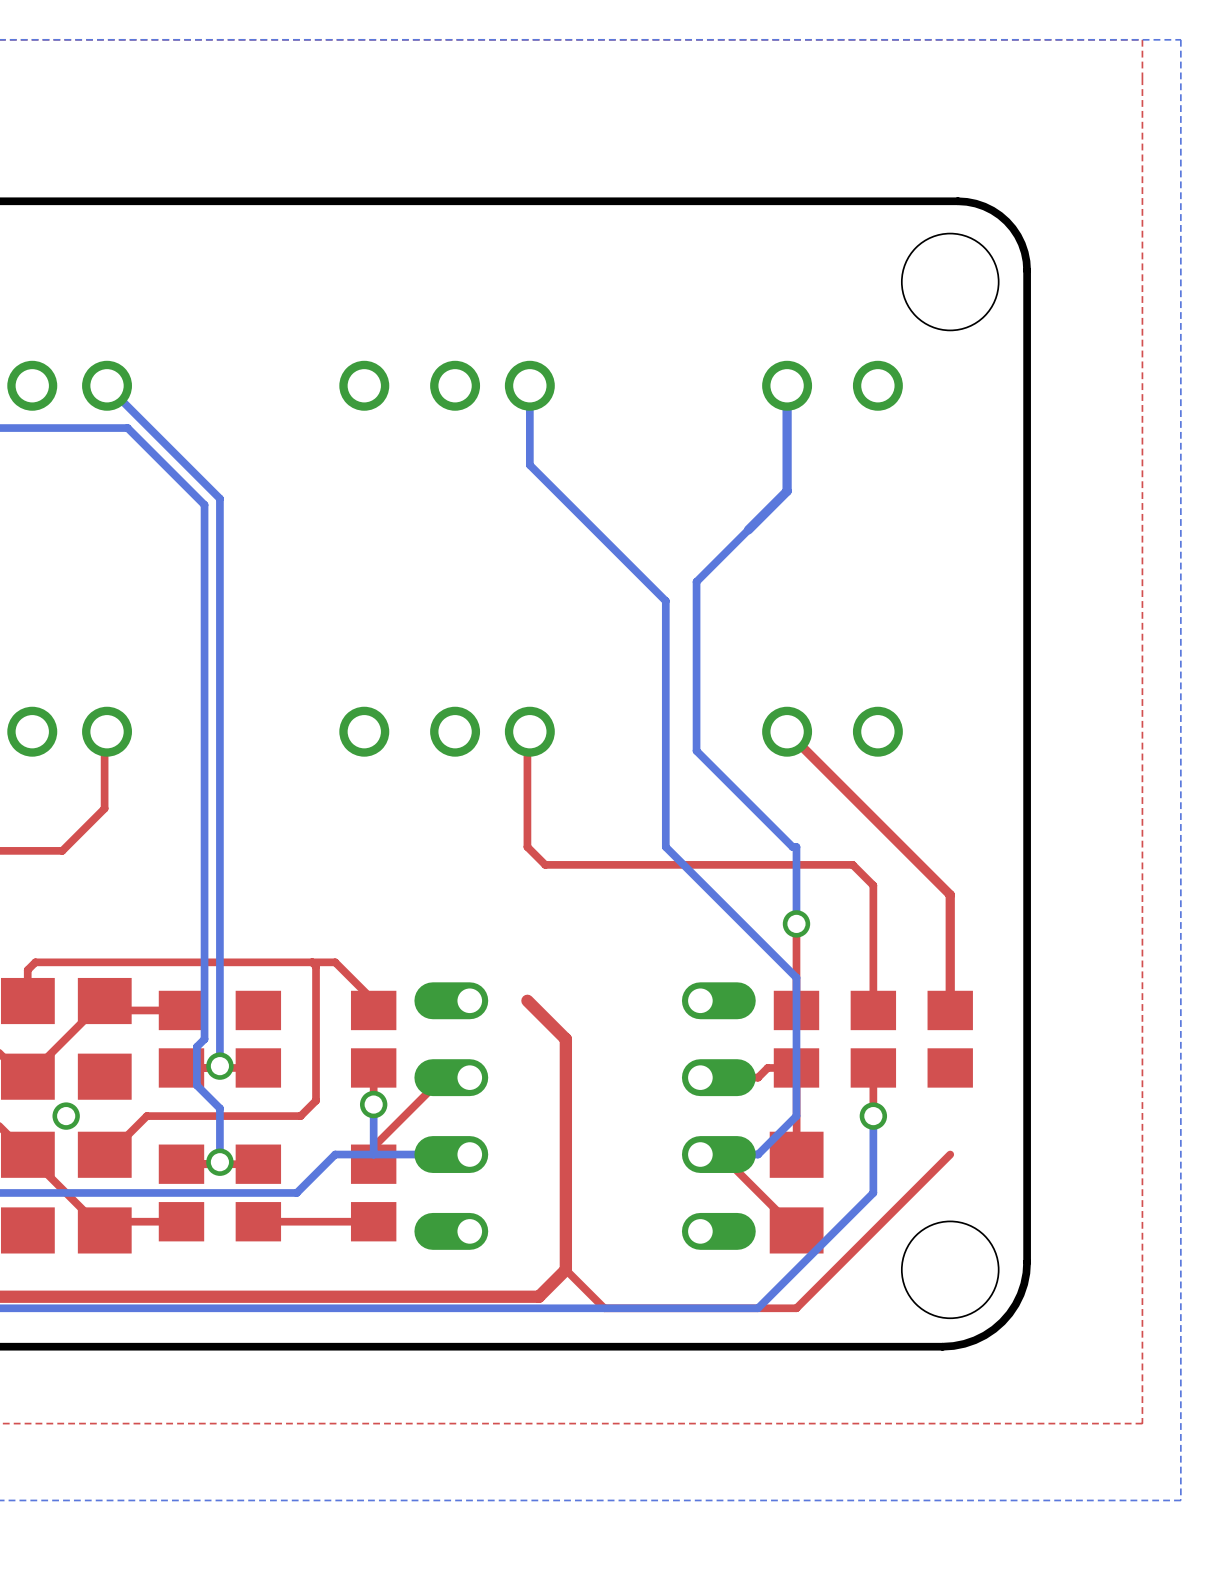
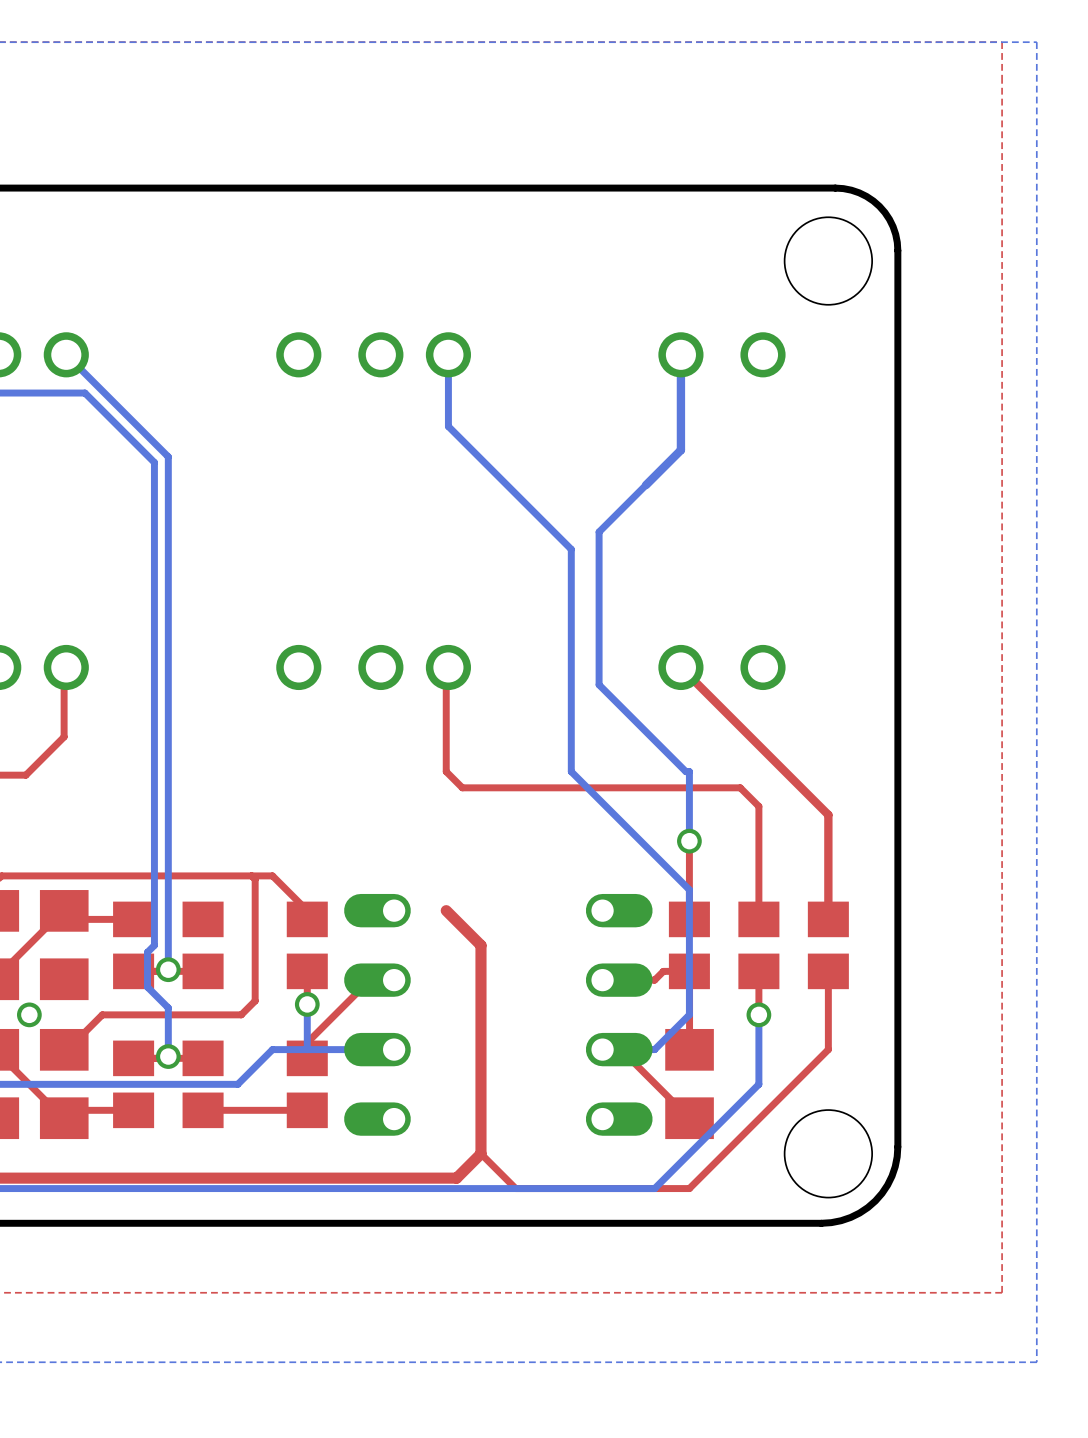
top track: none -> (828, 971) (828, 1049)

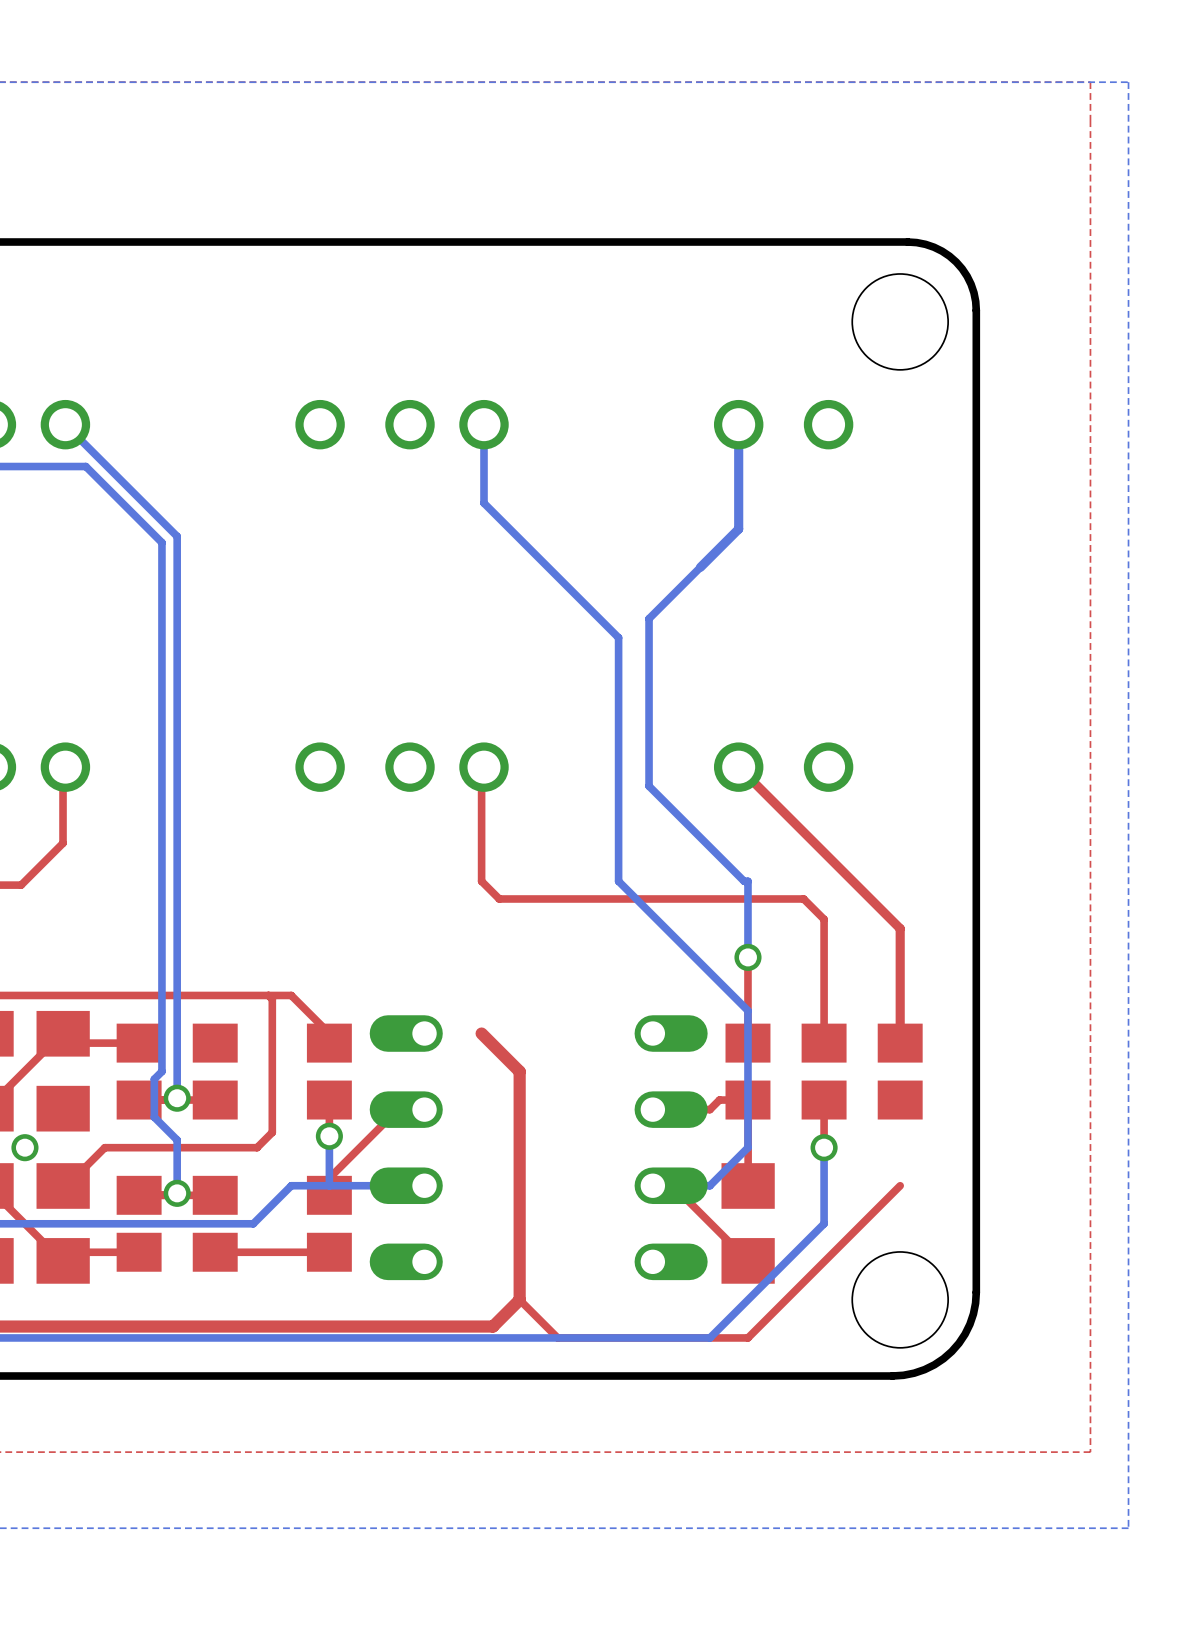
top track: (828, 971) (828, 1049) -> none

